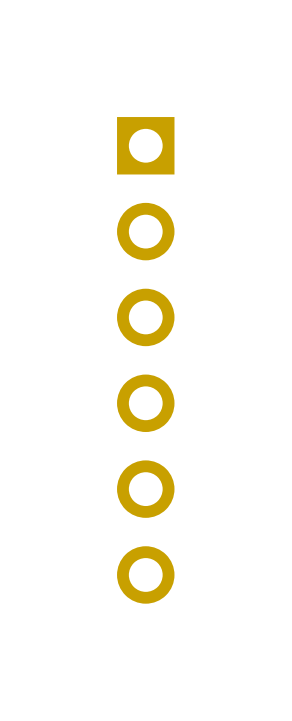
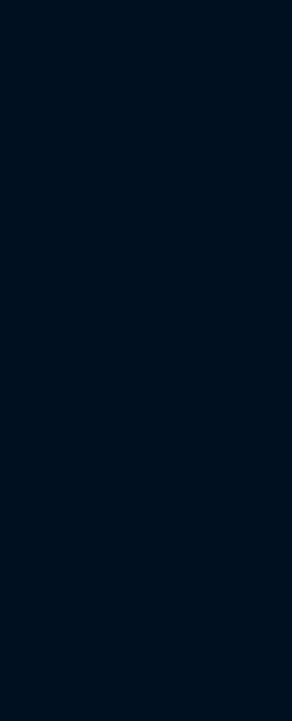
part: (145, 360) -> none

